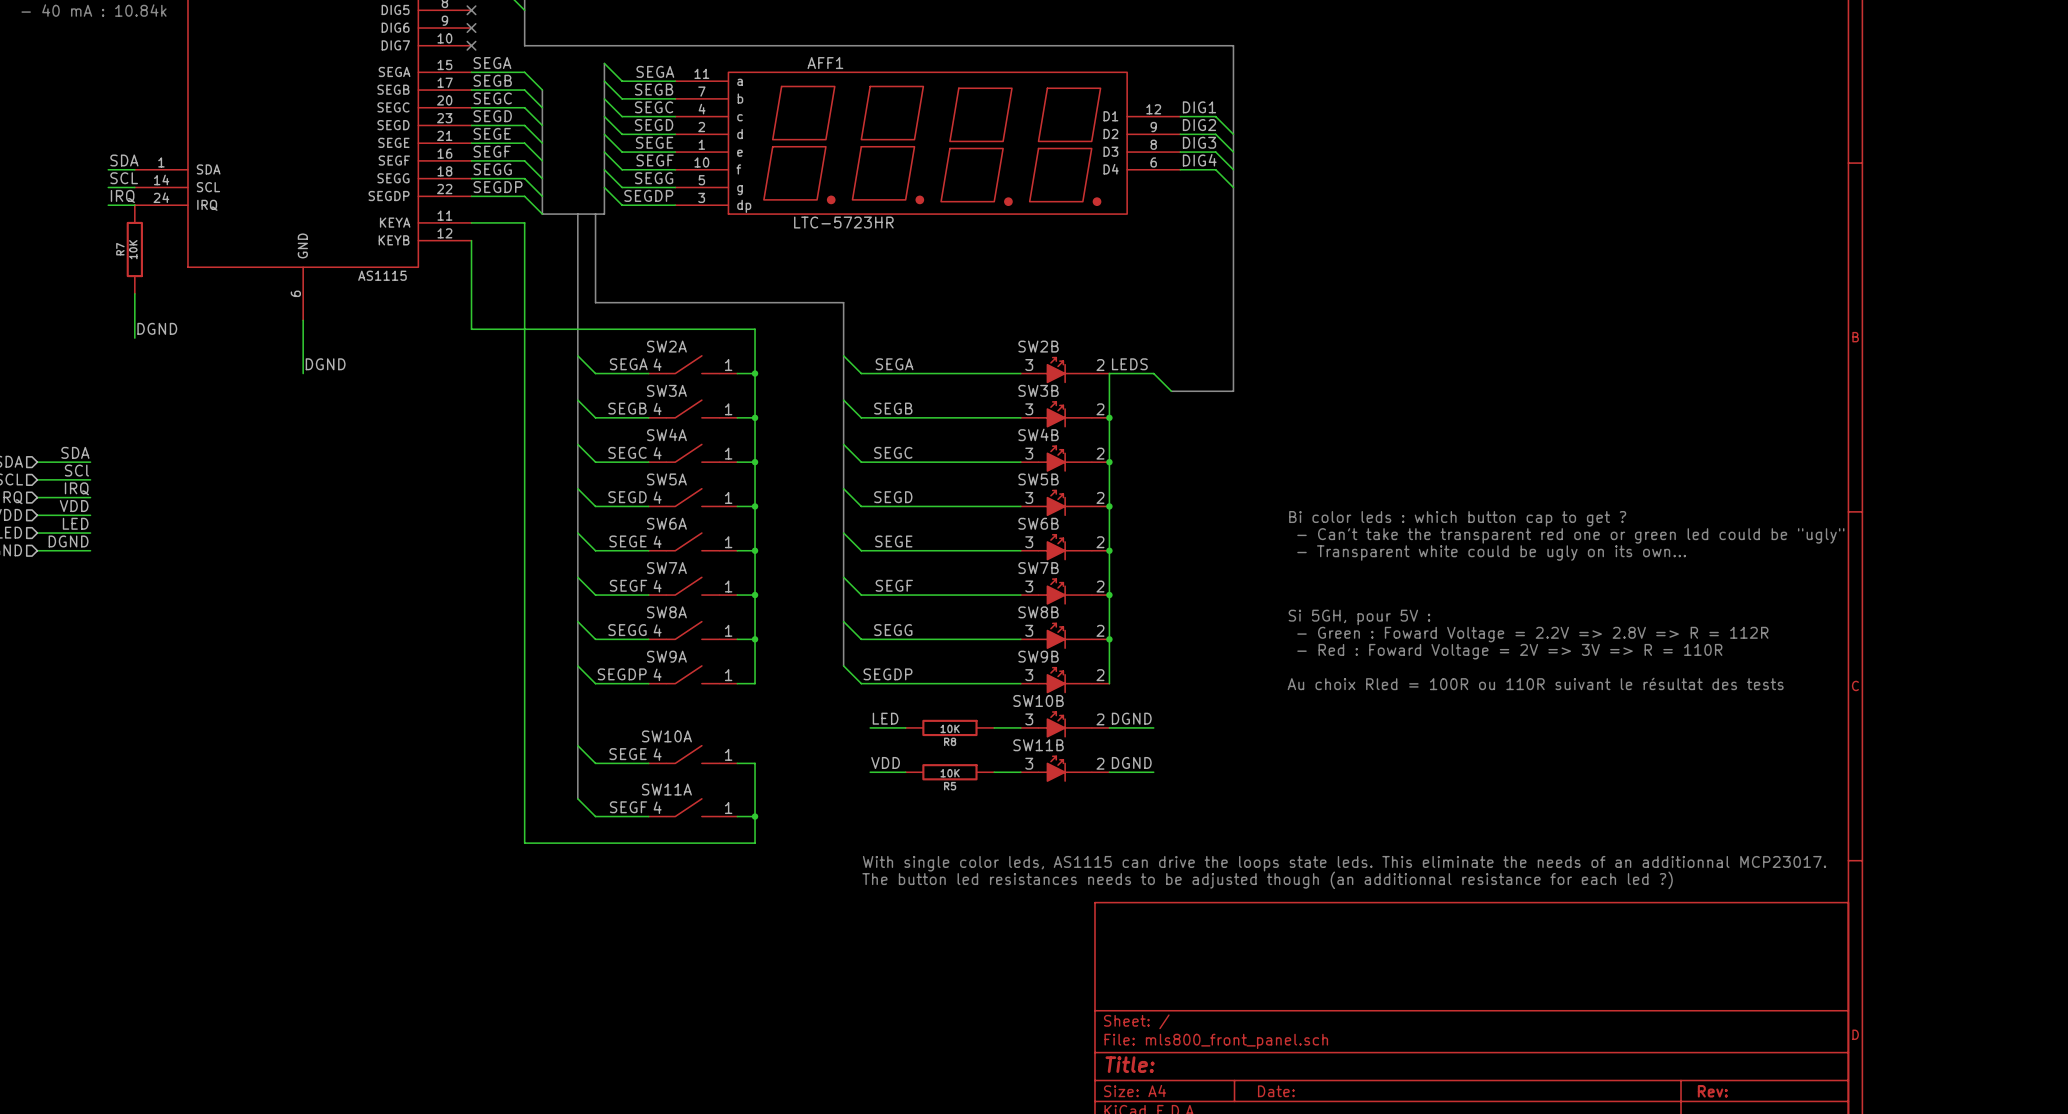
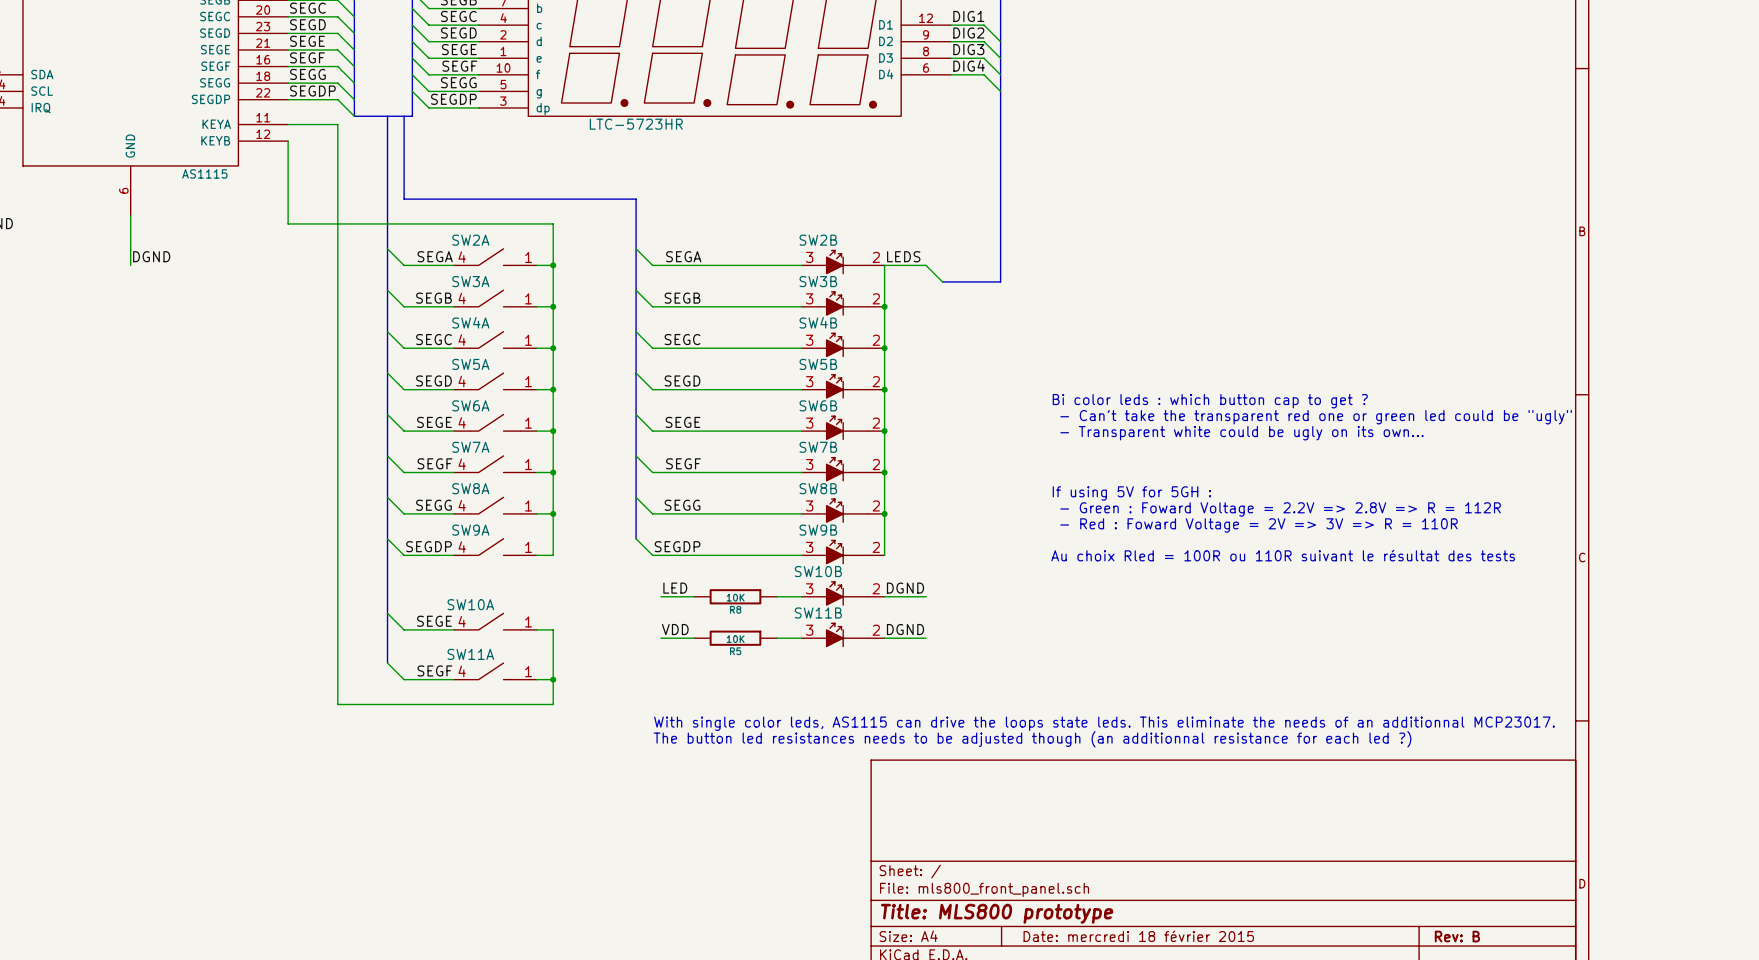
text: Si 5GH, pour 5V : (1359, 617) -> If using 5V for 5GH : (1131, 493)
title block: Title: (1130, 1064) -> Title: MLS800 prototype (997, 913)
title block: Date: (1276, 1091) -> Date: mercredi 18 février 2015 (1138, 936)
title block: Rev: (1712, 1091) -> Rev: B (1457, 936)

